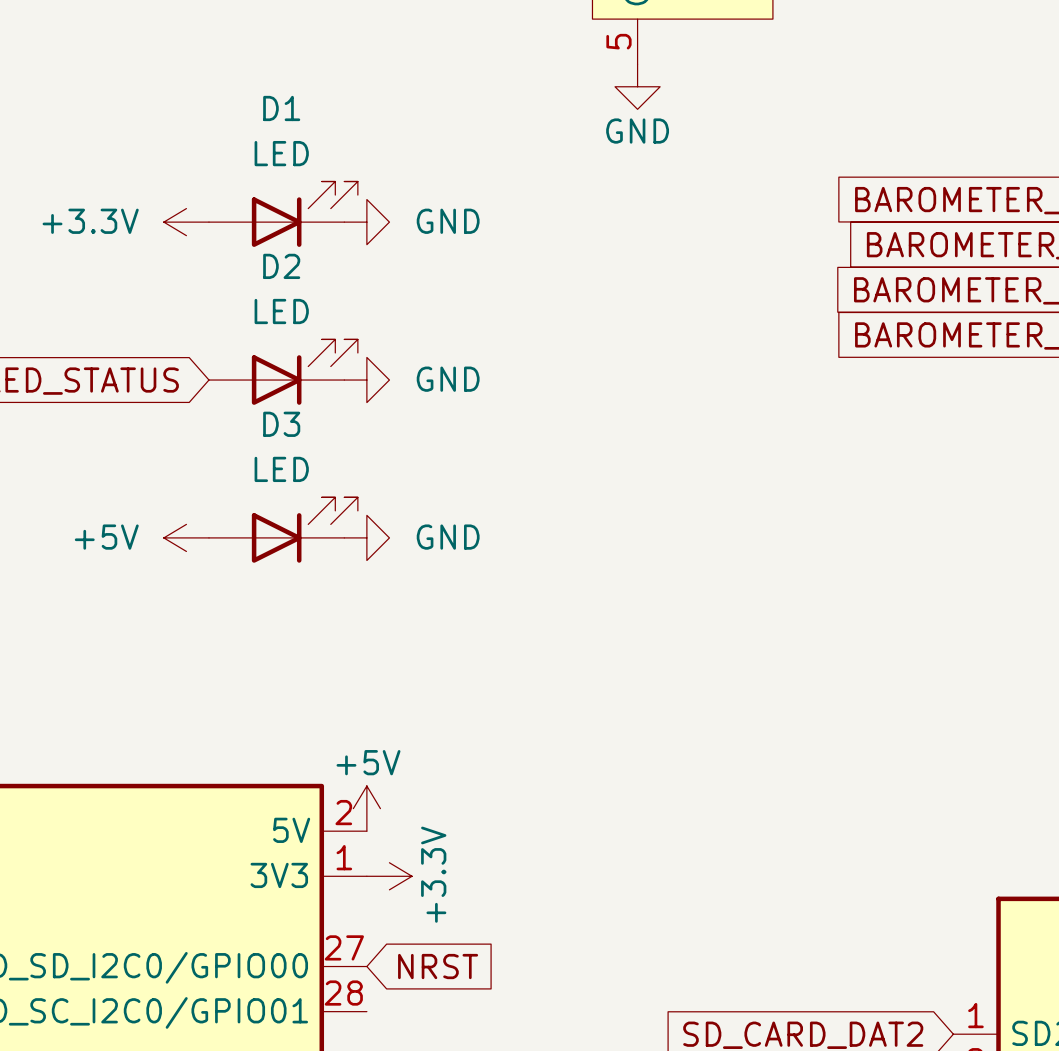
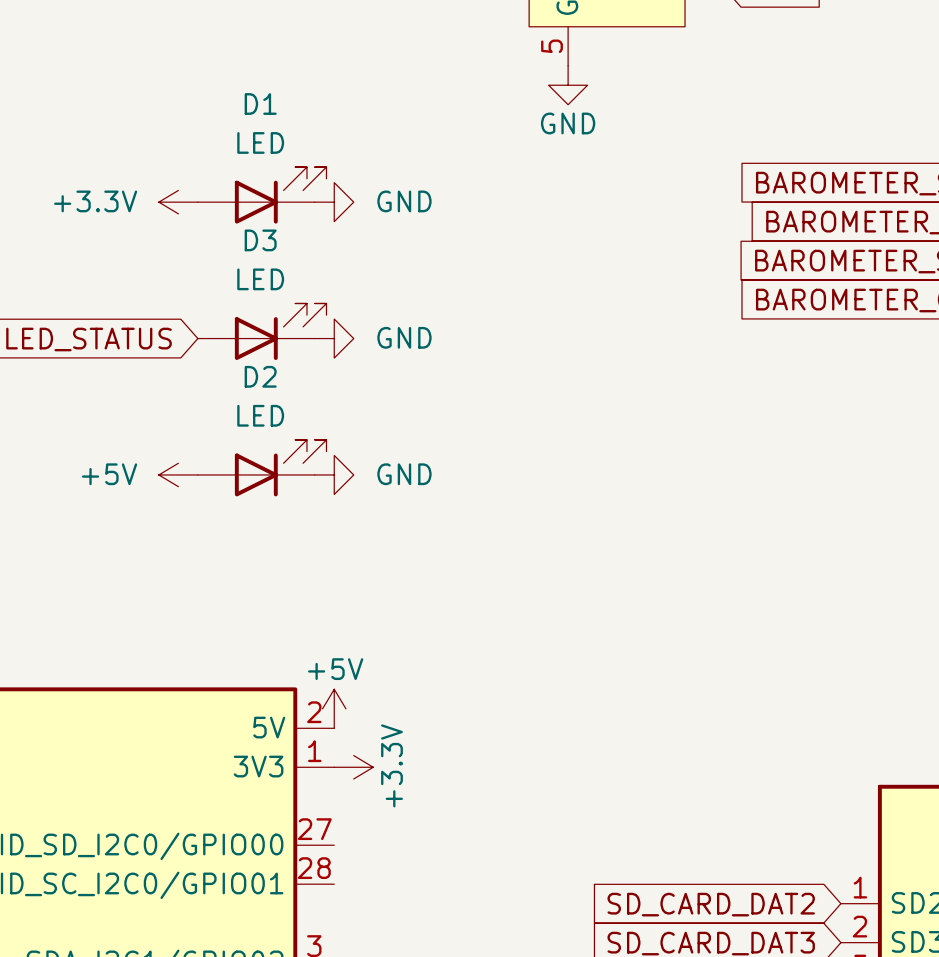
D2 name: D2 (281, 266) -> D3 (260, 240)
D3 name: D3 (281, 424) -> D2 (260, 376)
global label: NRST (438, 966) -> none

